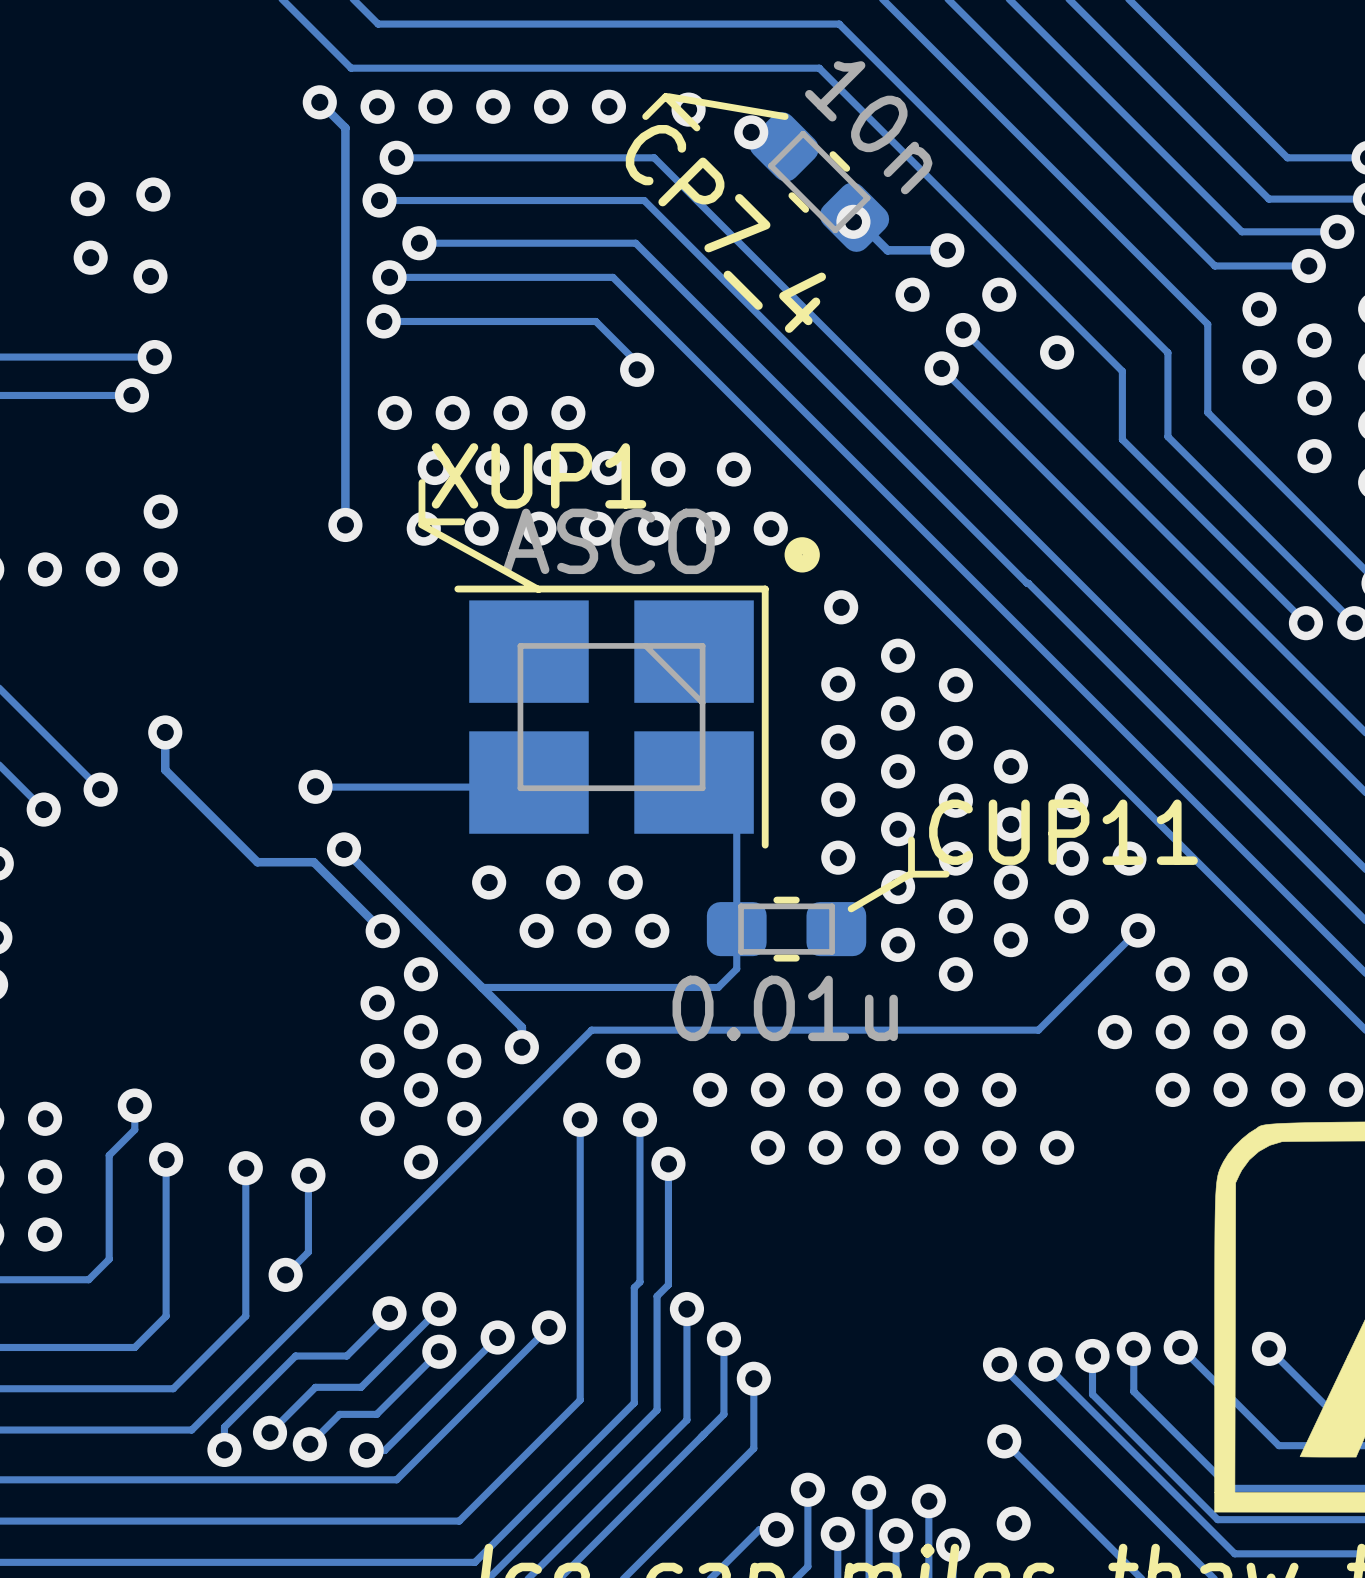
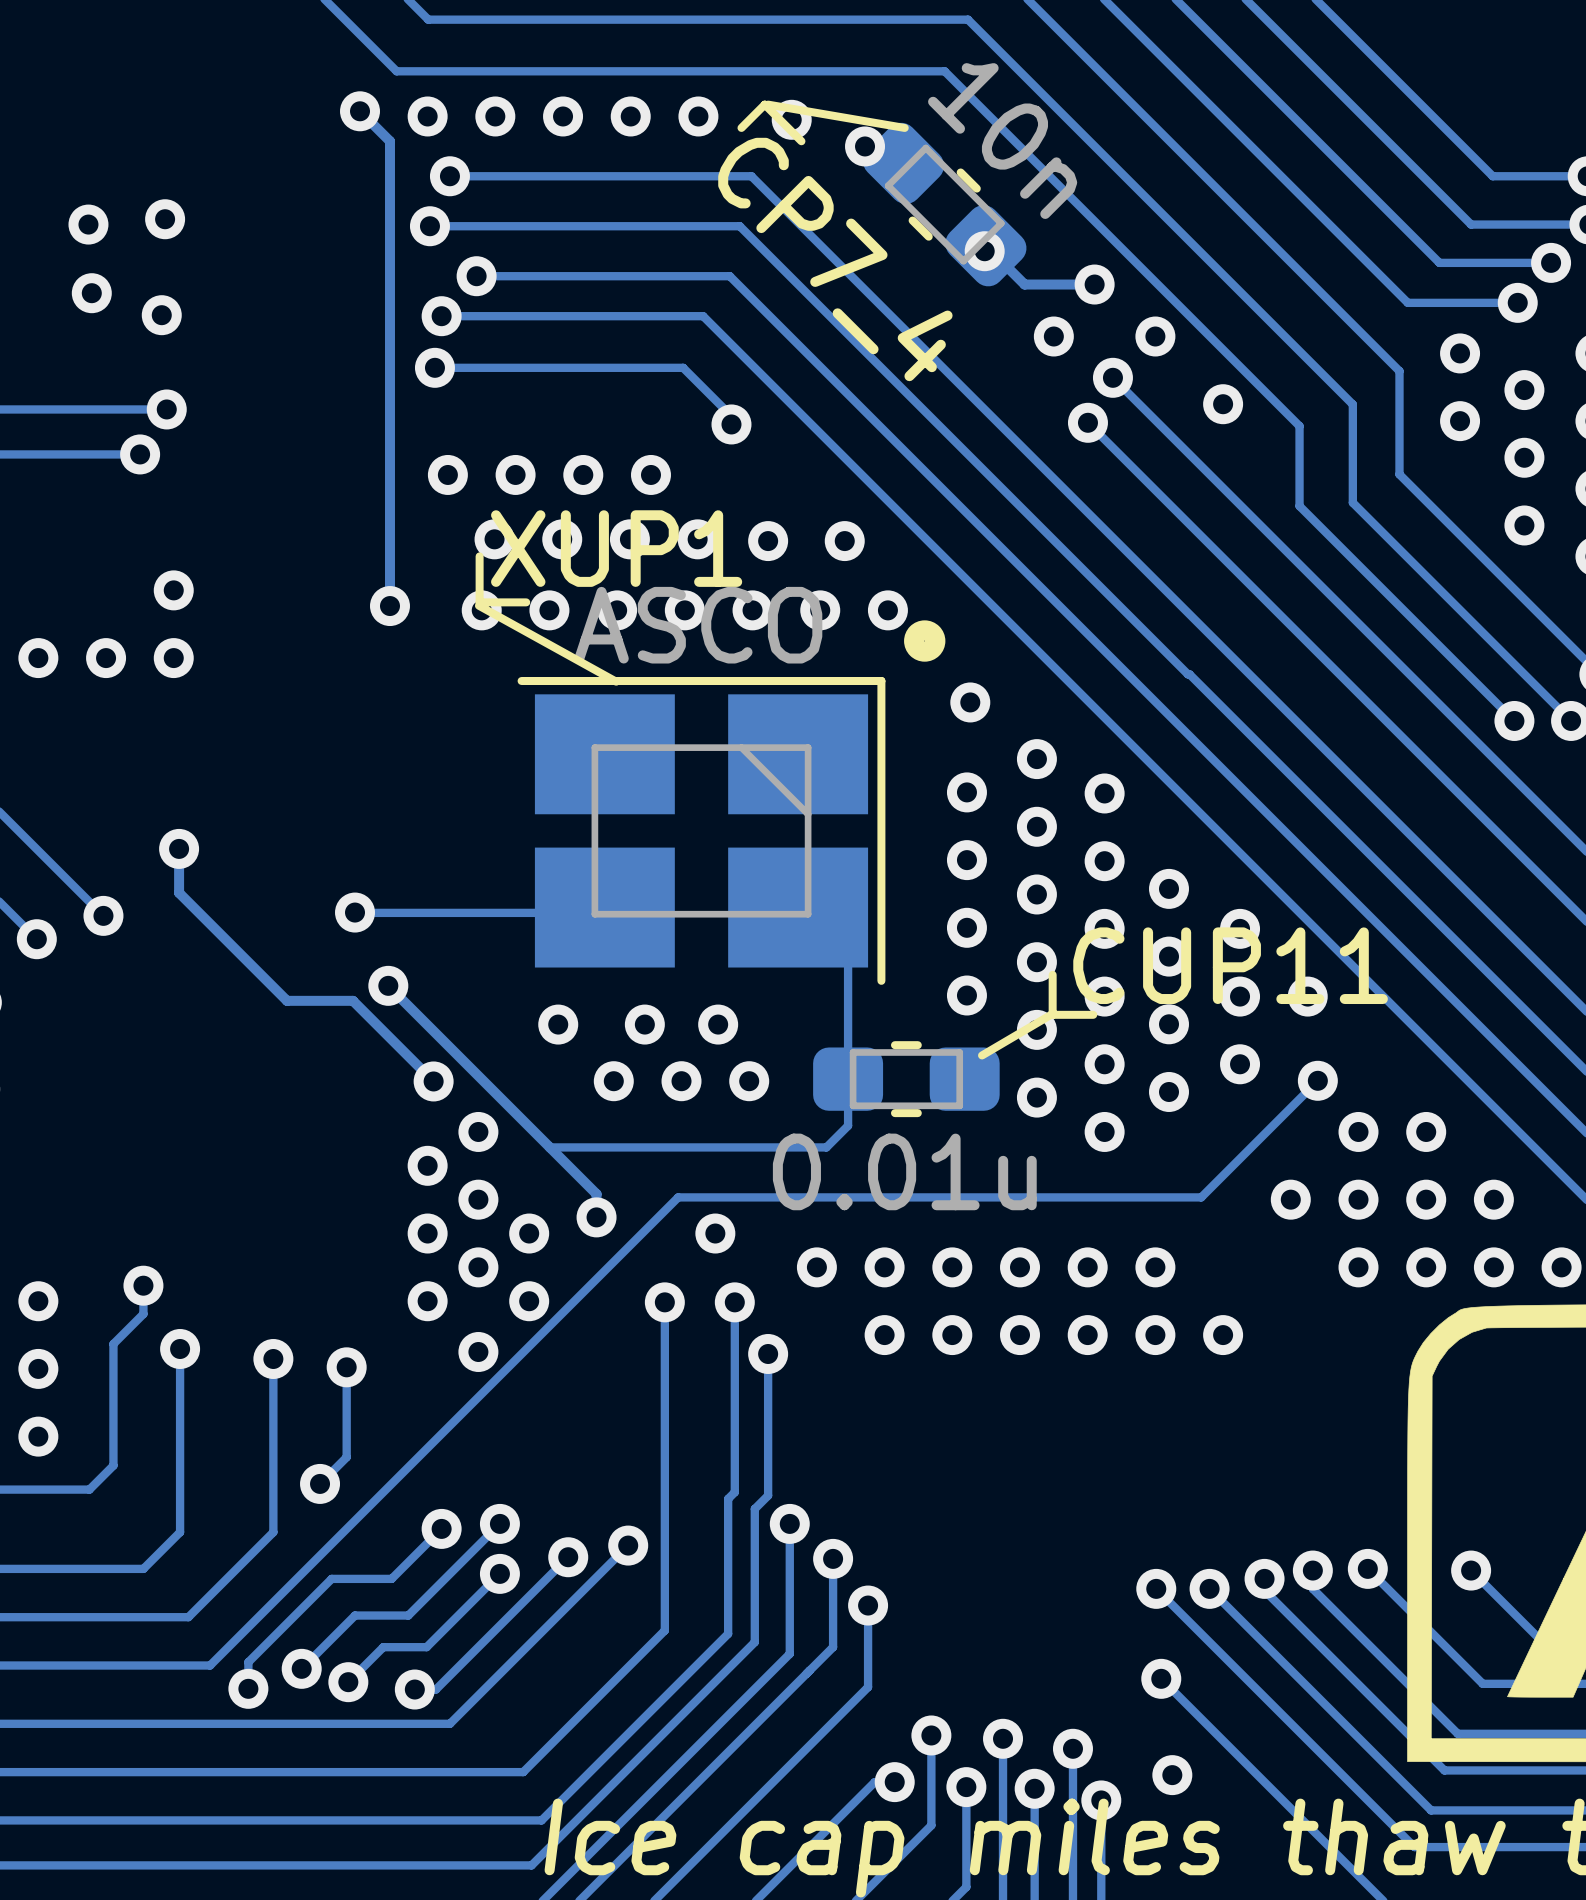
track: (1133, 1364) (1133, 1391) (1230, 1488) (1257, 1488) -> (1312, 1588) (1457, 1733)
track: (1092, 1365) (1092, 1394) (1217, 1519) (1246, 1519) -> (1264, 1590) (1444, 1770)

